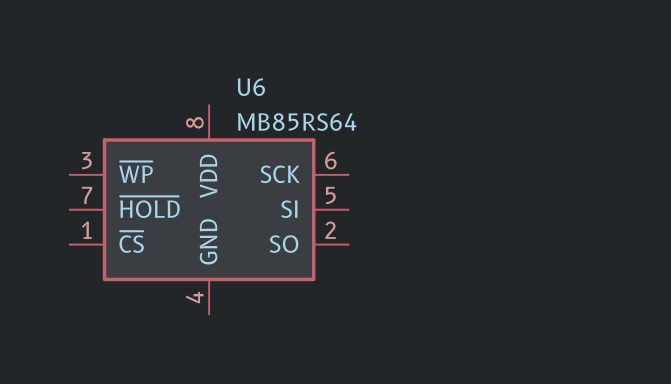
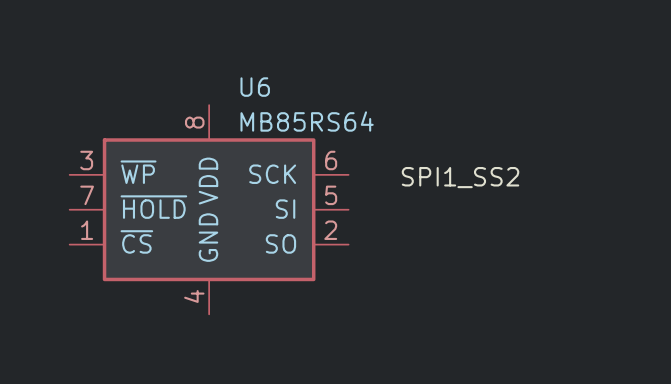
label: none -> SPI1_SS2 (460, 177)

